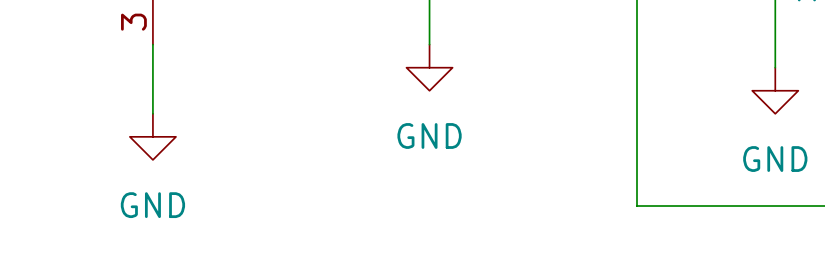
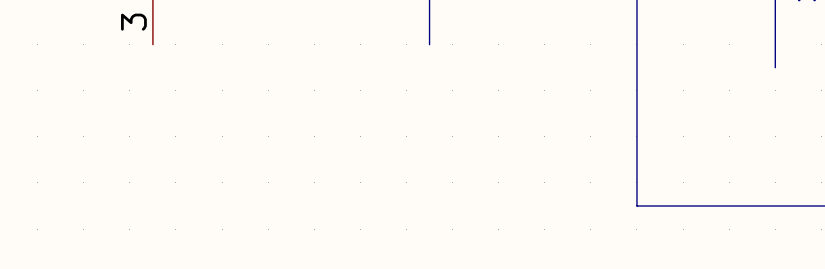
wire: (152, 44) (152, 113) -> none
power symbol: GND (429, 67) -> none
power symbol: GND (775, 90) -> none
power symbol: GND (152, 136) -> none

